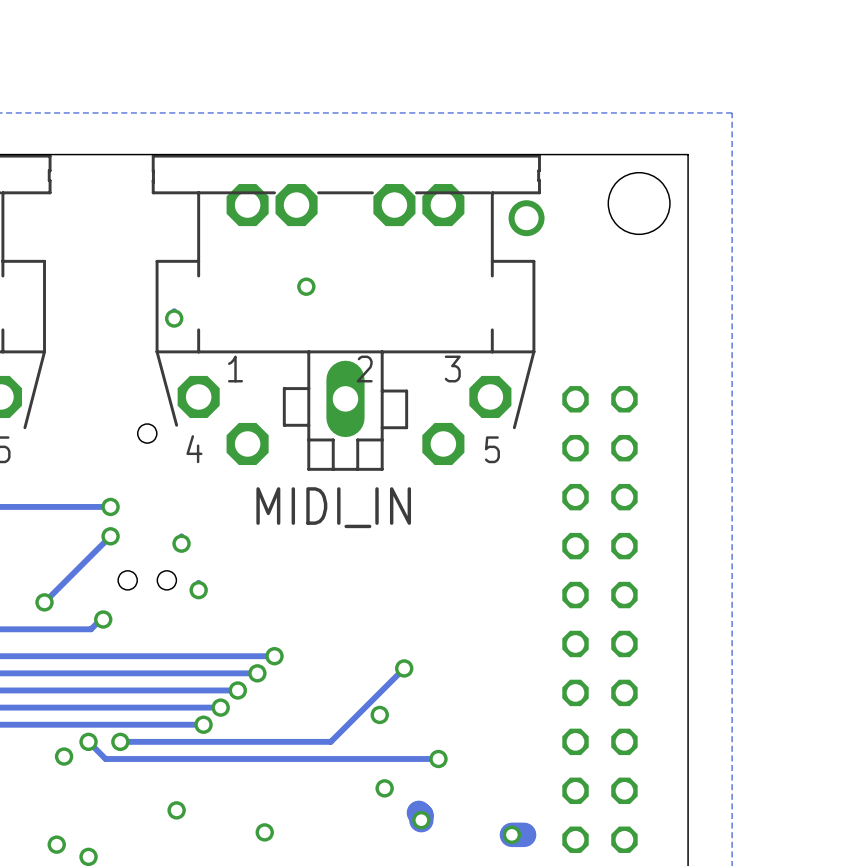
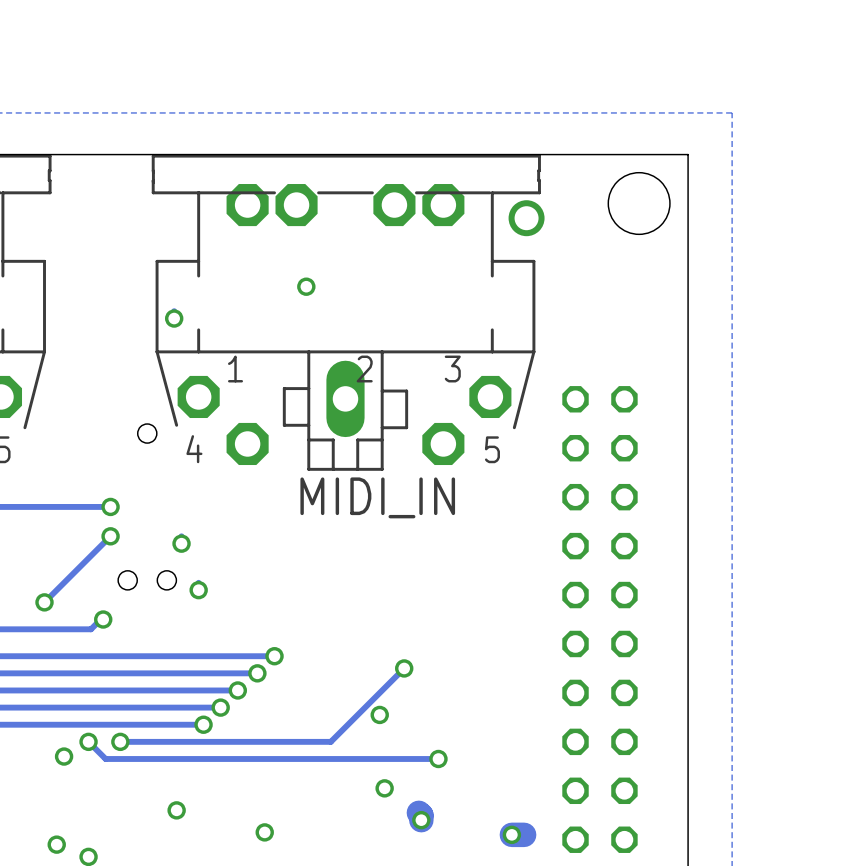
MIDI_IN name position: MIDI_IN (333, 507) -> MIDI_IN (377, 497)

